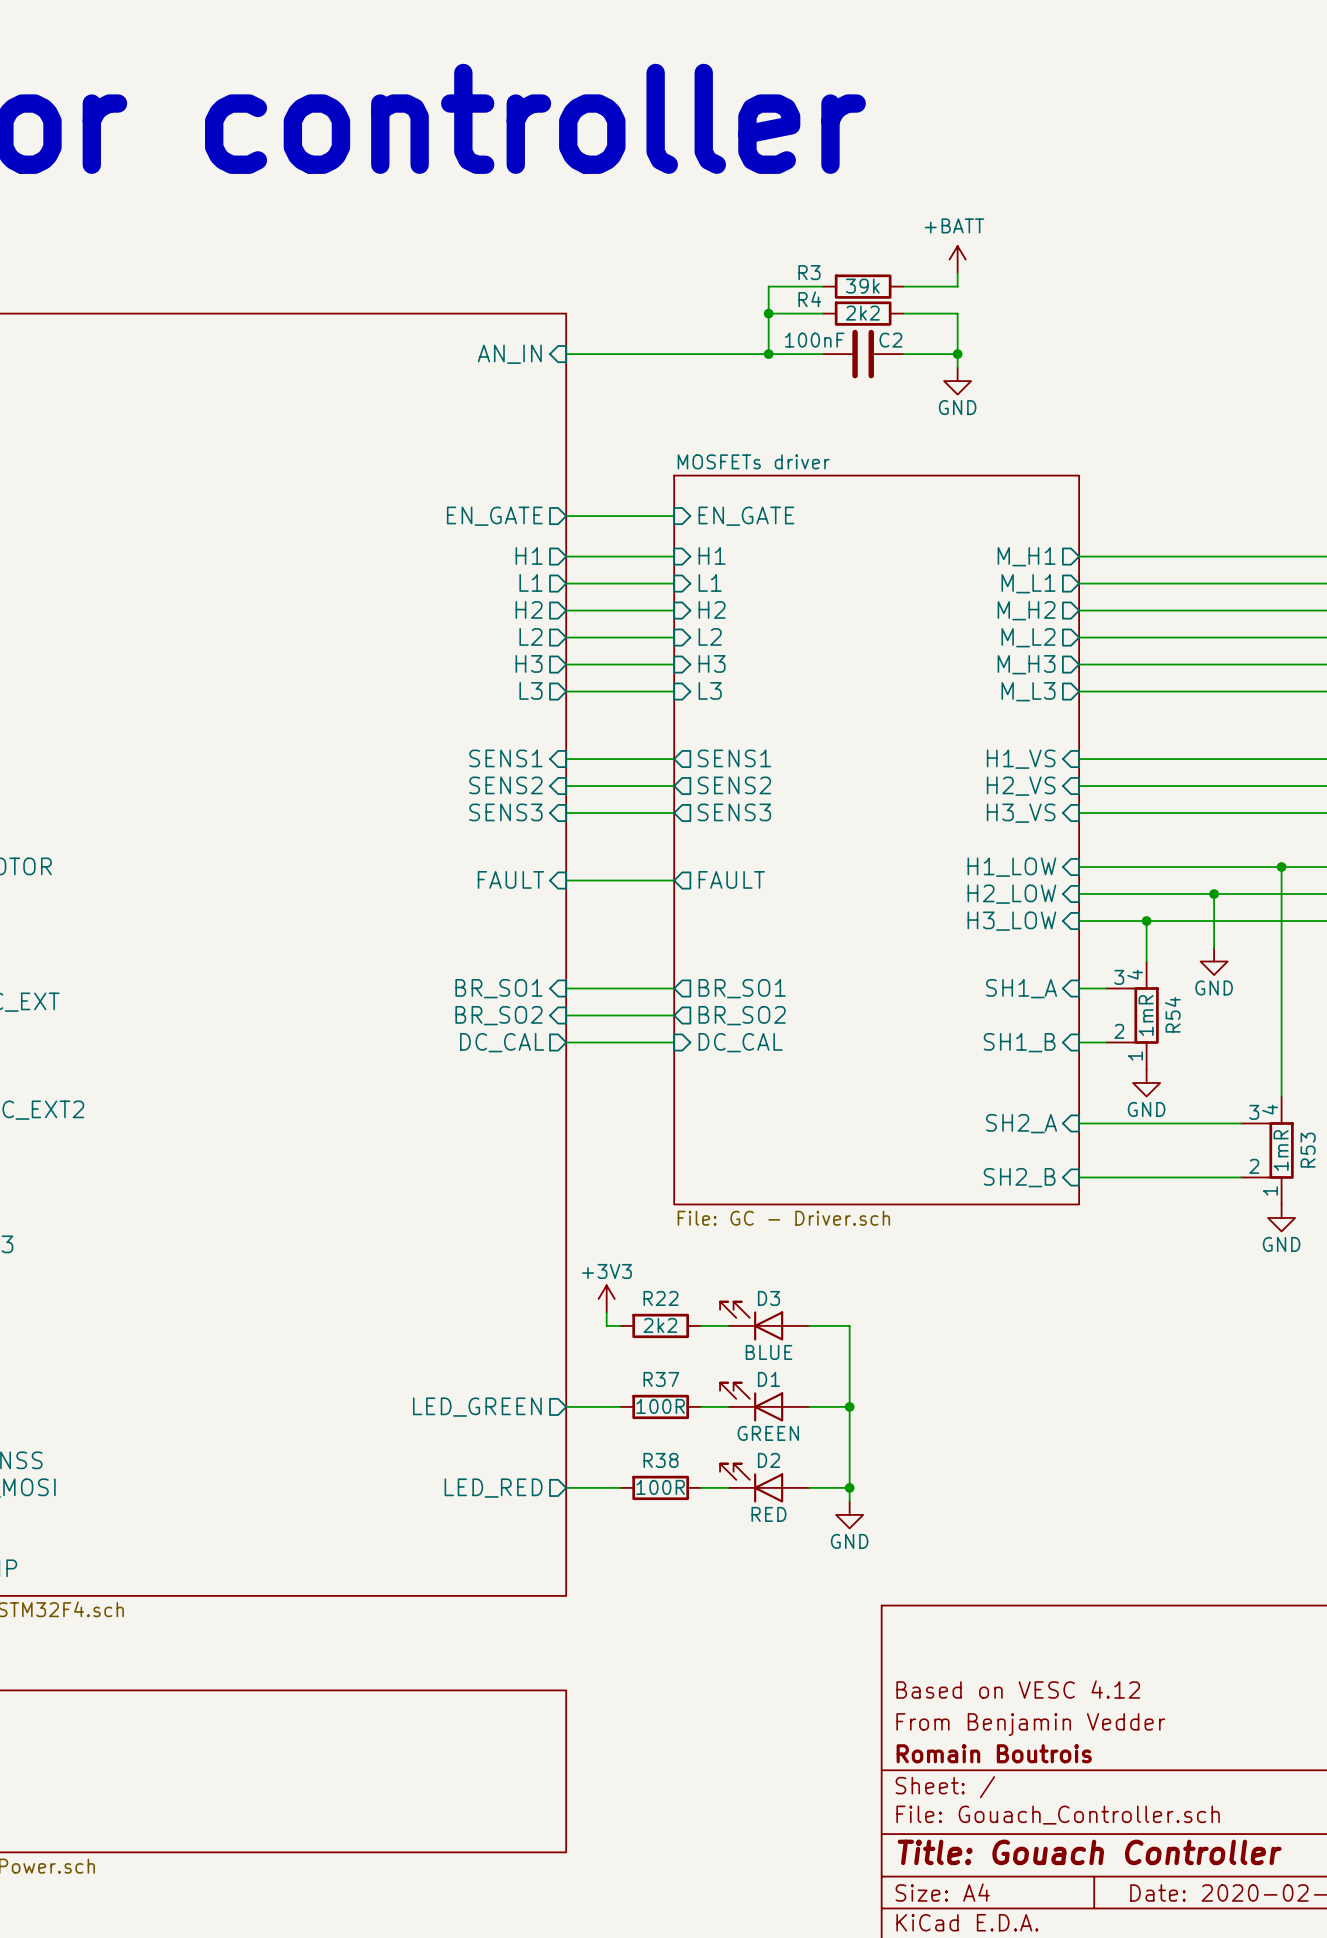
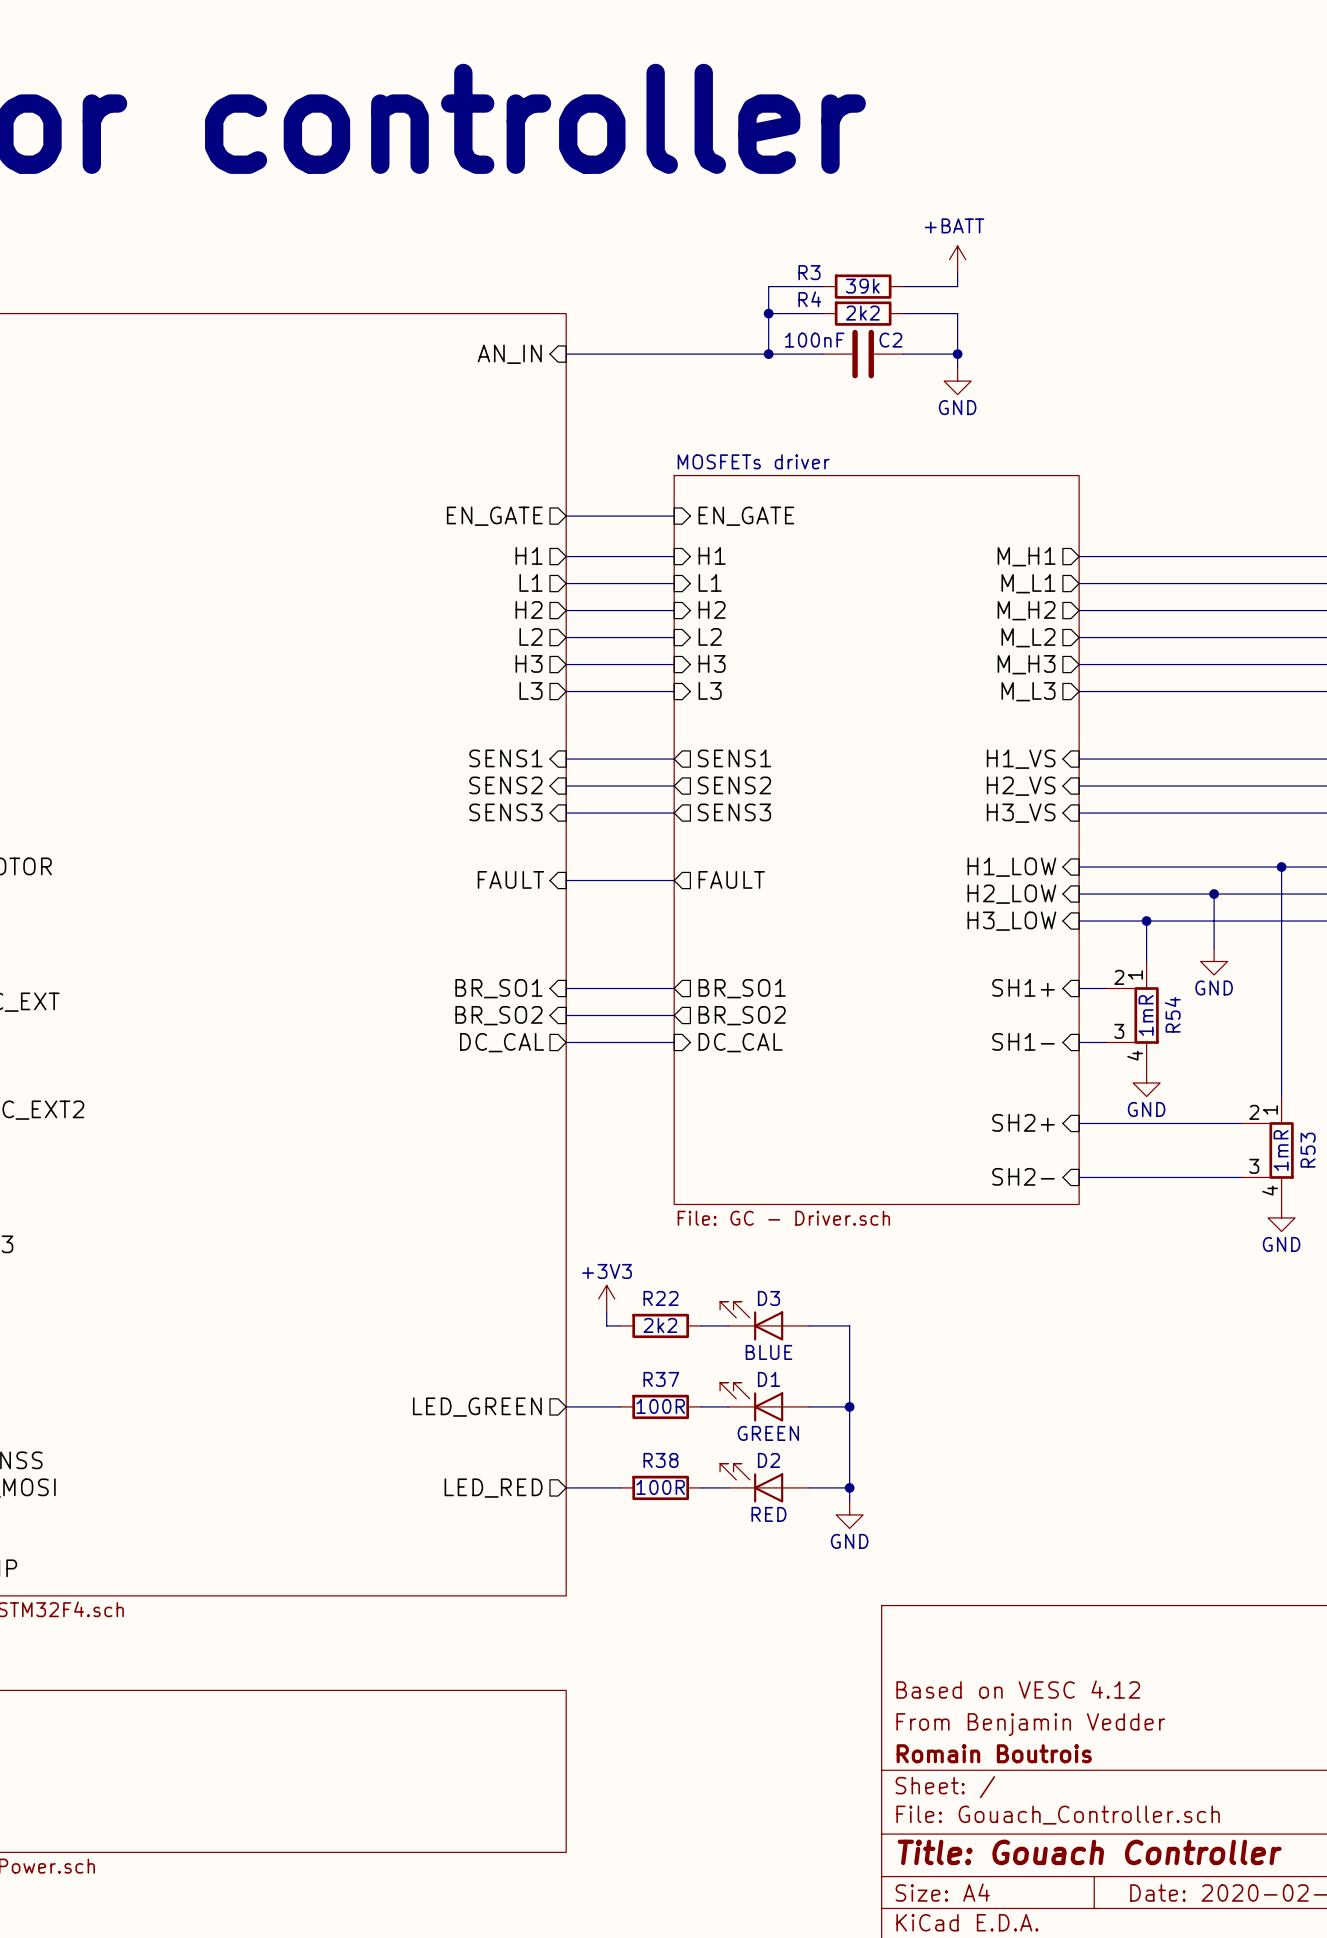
sheet pin: SH1_A (1021, 988) -> SH1+ (1023, 987)
R54 flip: as is (1145, 1015) -> up-down (1145, 1015)
sheet pin: SH1_B (1019, 1042) -> SH1- (1023, 1041)
sheet pin: SH2_A (1021, 1123) -> SH2+ (1023, 1122)
R53 flip: as is (1280, 1150) -> up-down (1280, 1150)
sheet pin: SH2_B (1019, 1177) -> SH2- (1023, 1176)

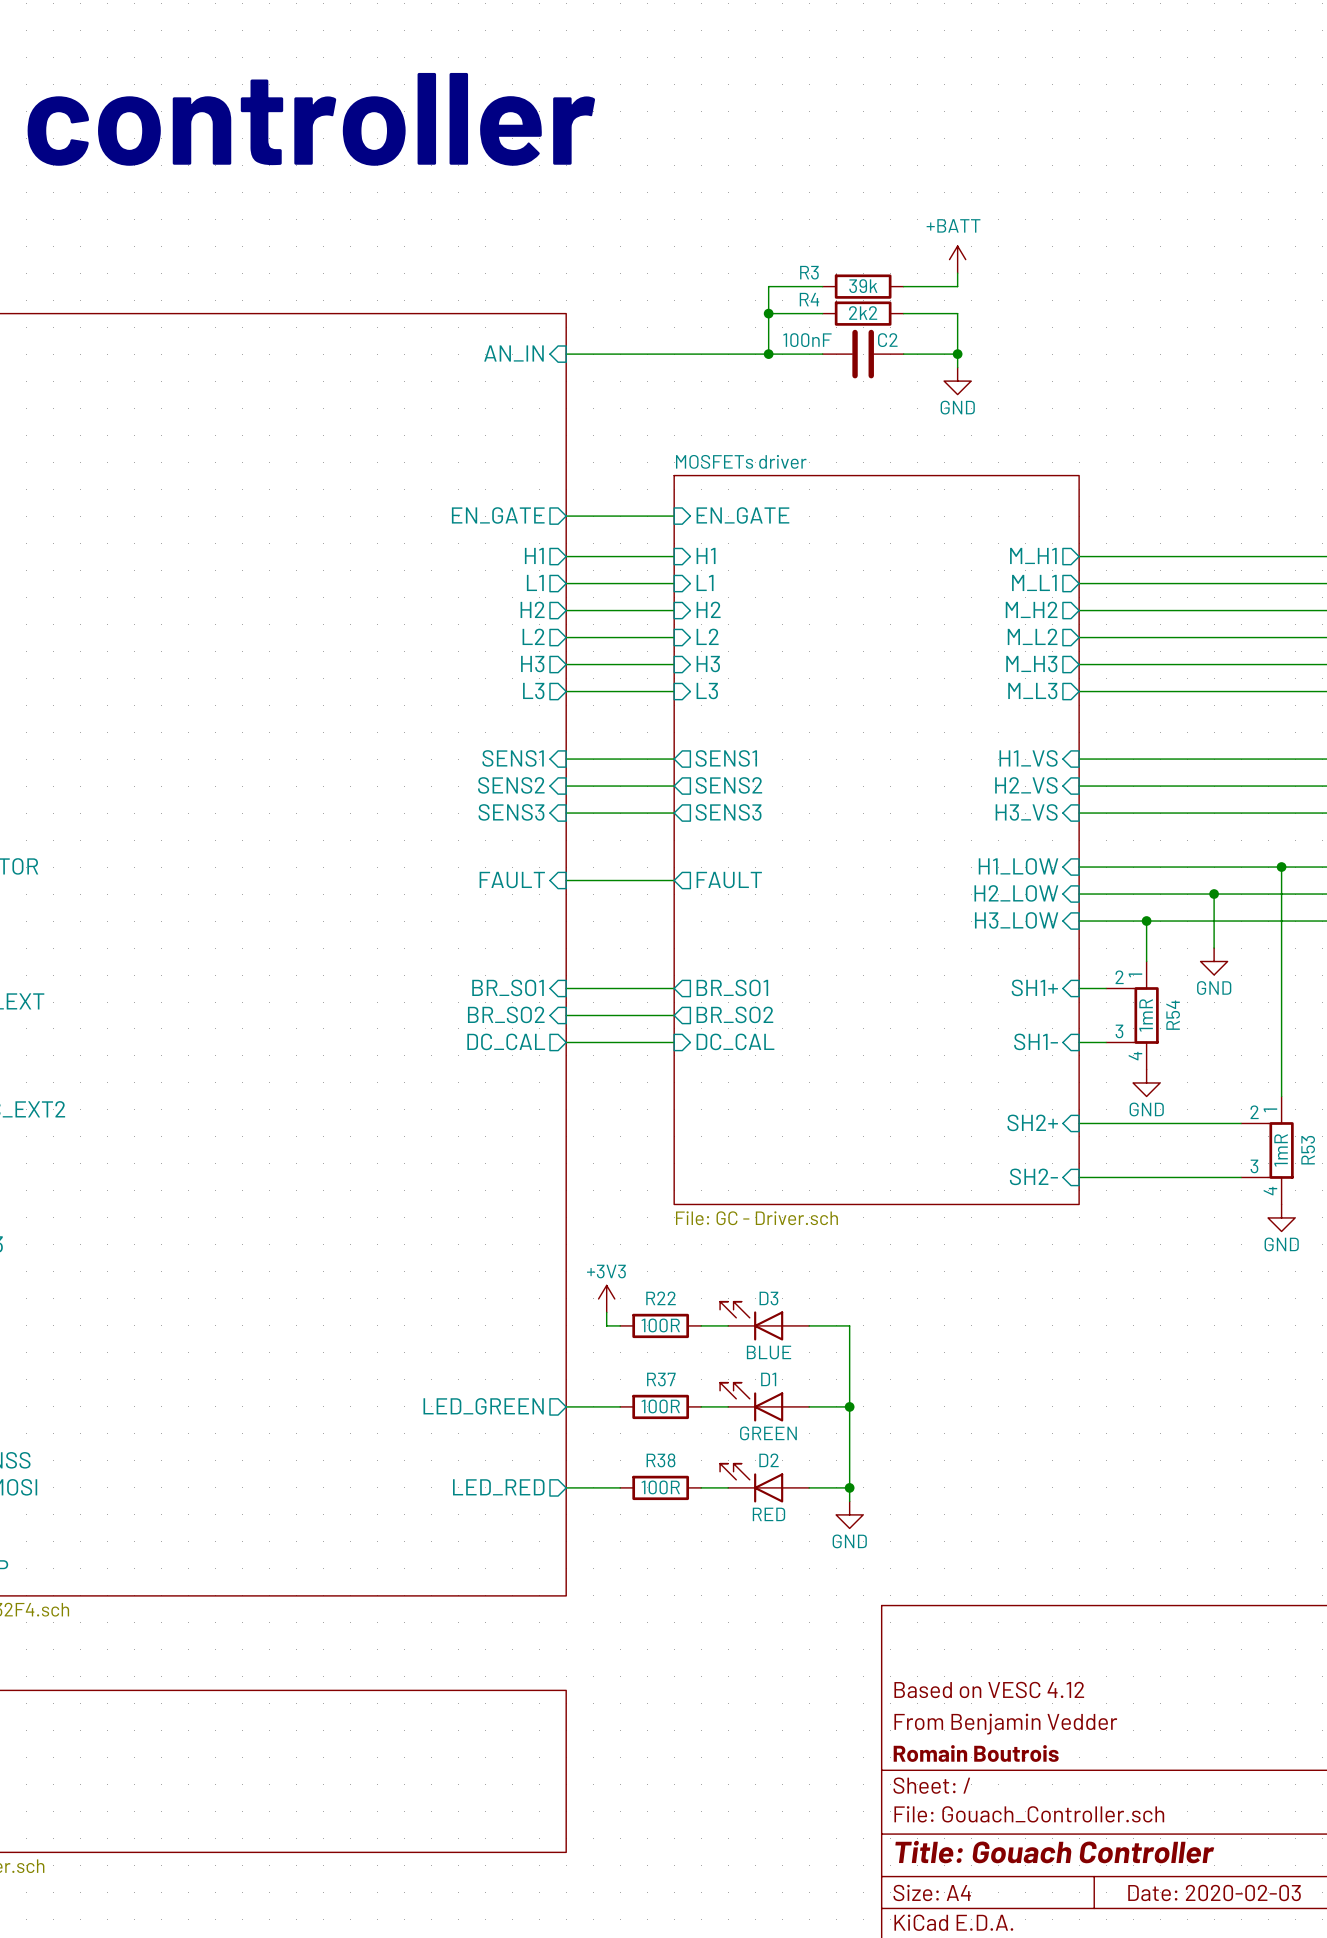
R22 value: 2k2 (660, 1325) -> 100R (660, 1325)

